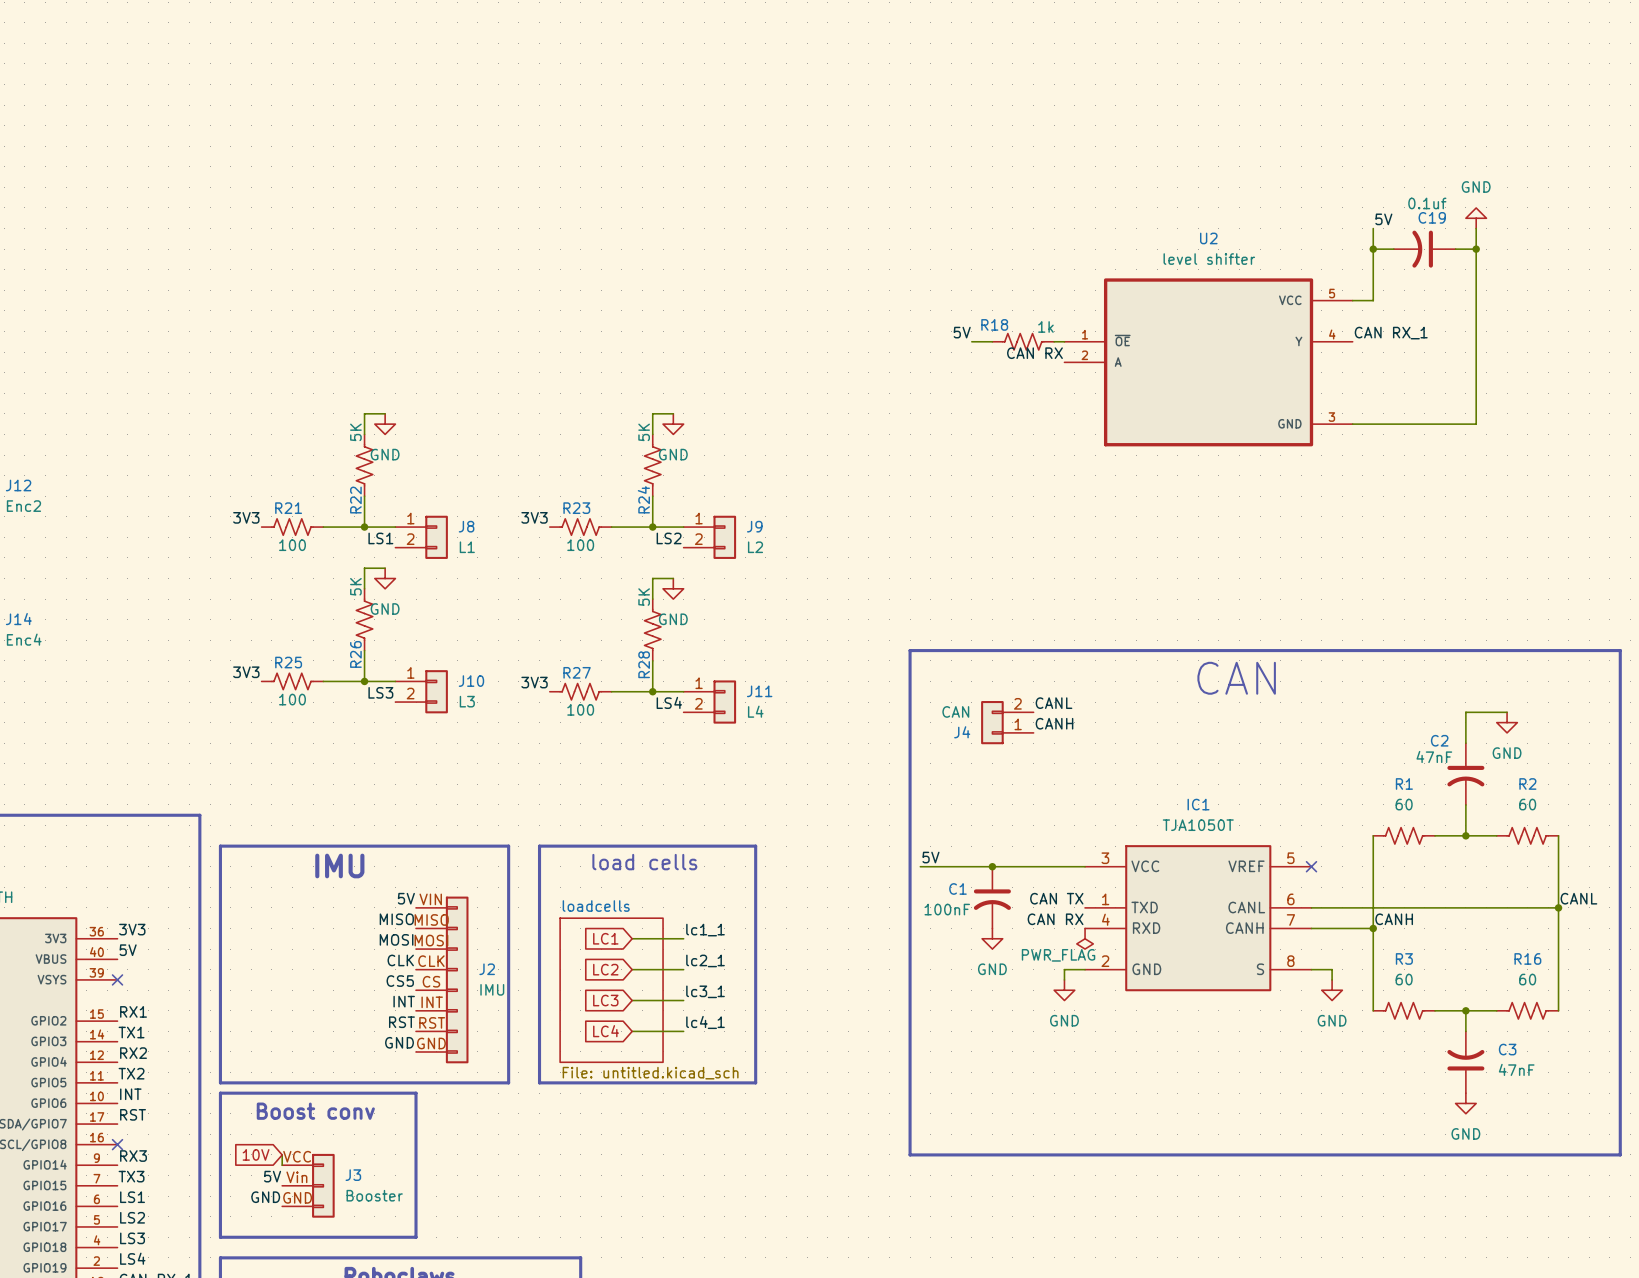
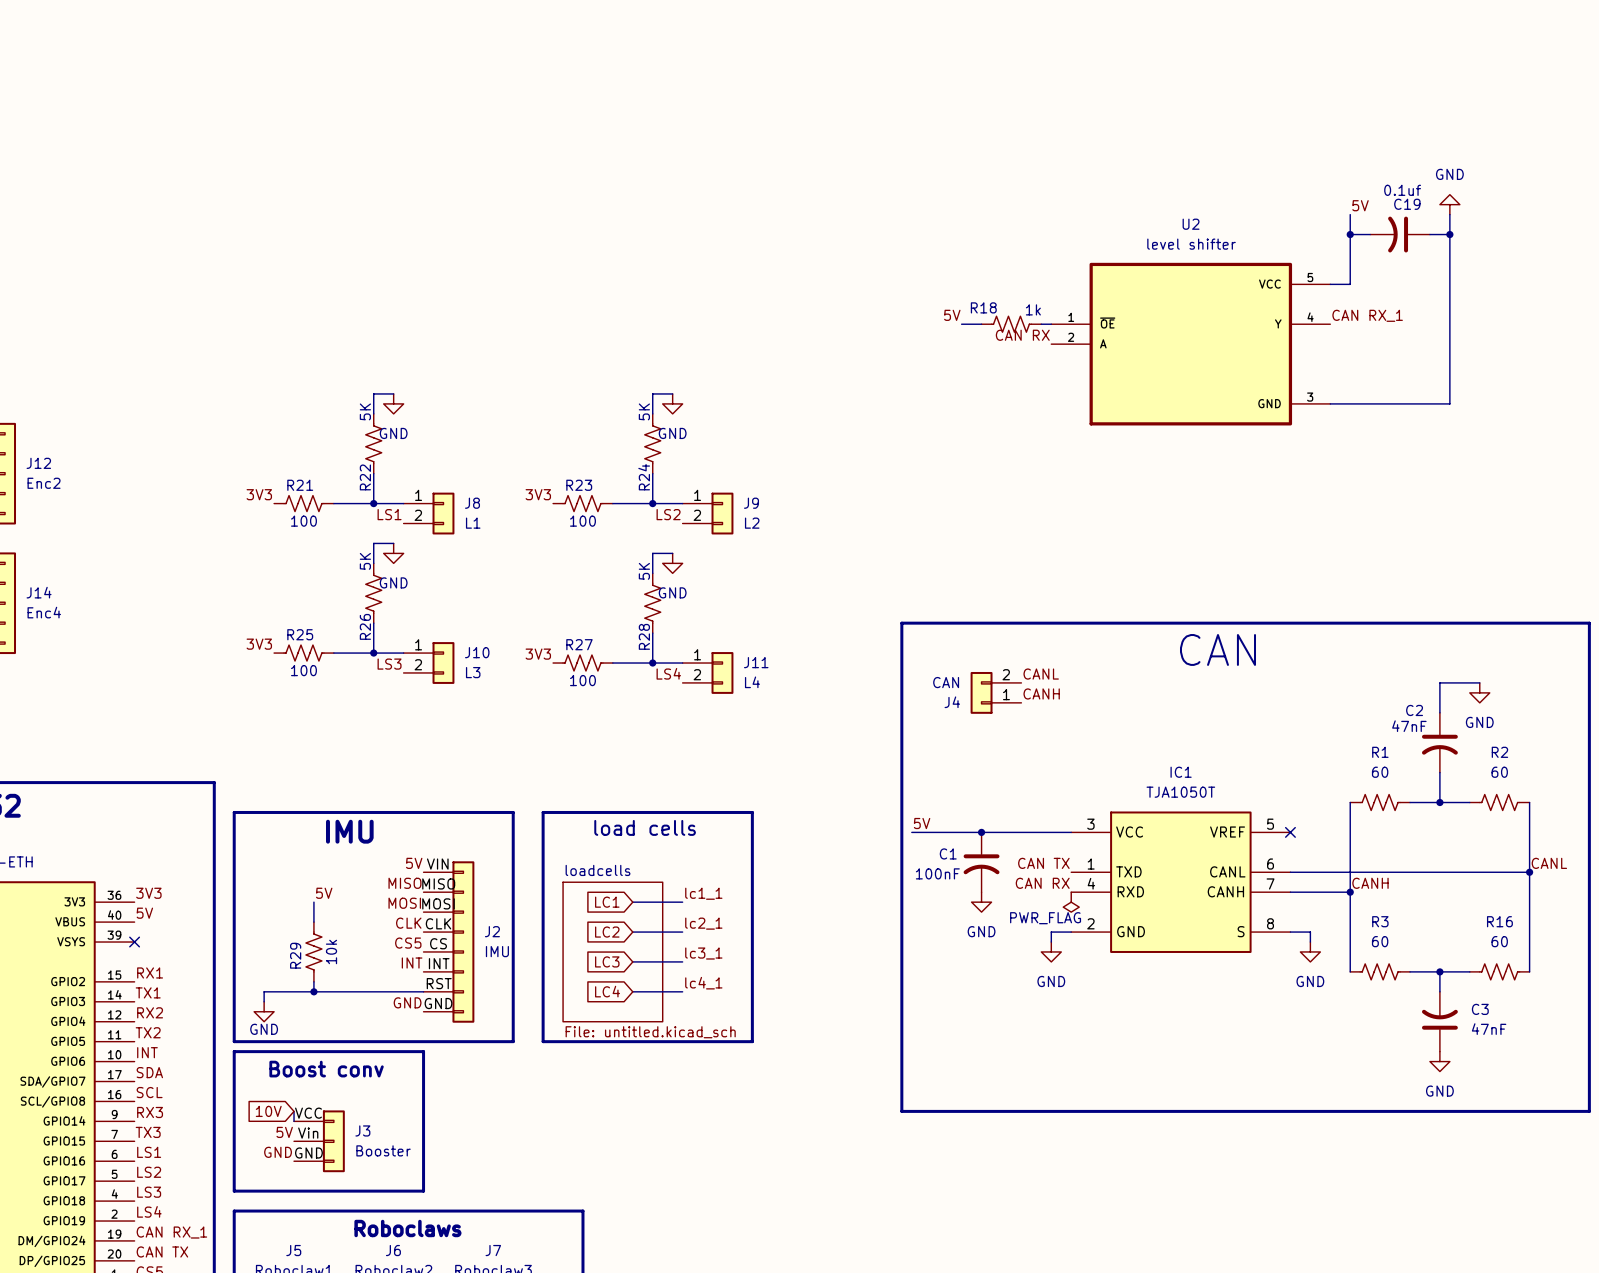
label: none -> 5V (324, 893)
wire: none -> (313, 902) (313, 922)
R29: none -> 10k (313, 951)
wire: none -> (313, 981) (313, 991)
label: RST (401, 1022) -> none
junction: none -> (313, 991)
wire: none -> (423, 991) (264, 991) (264, 1001)
power symbol: none -> GND (264, 1011)
label: RST (133, 1114) -> SDA (149, 1072)
label: none -> SCL (149, 1092)
no-connect mark: (117, 1144) -> none

